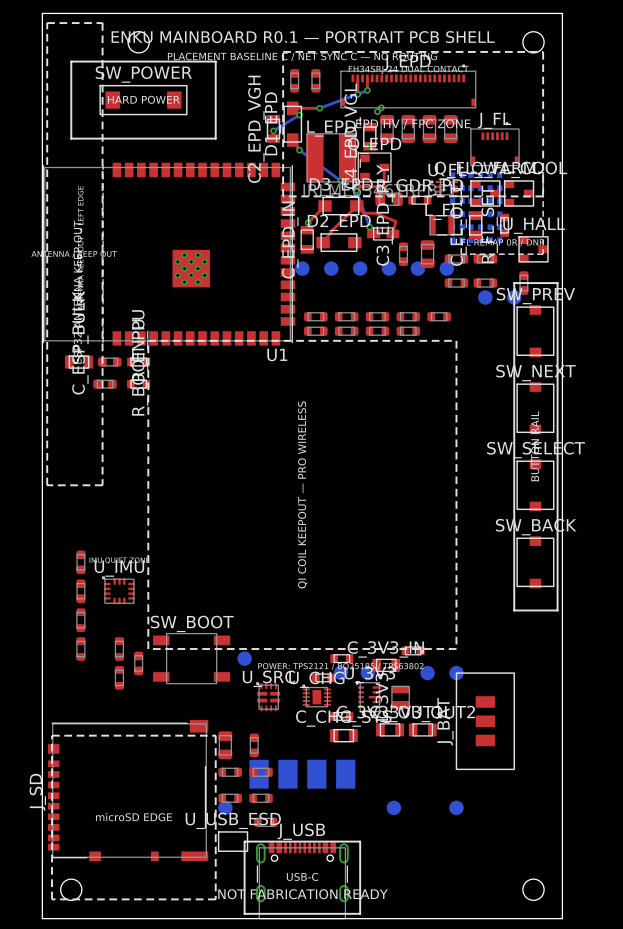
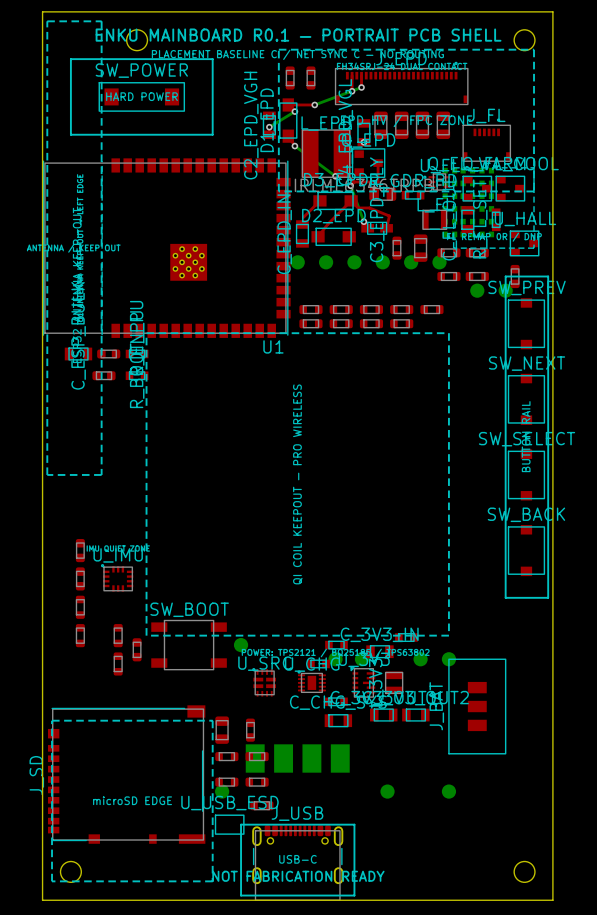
via: (381, 107) -> none
via: (377, 111) -> none
via: (308, 222) -> none

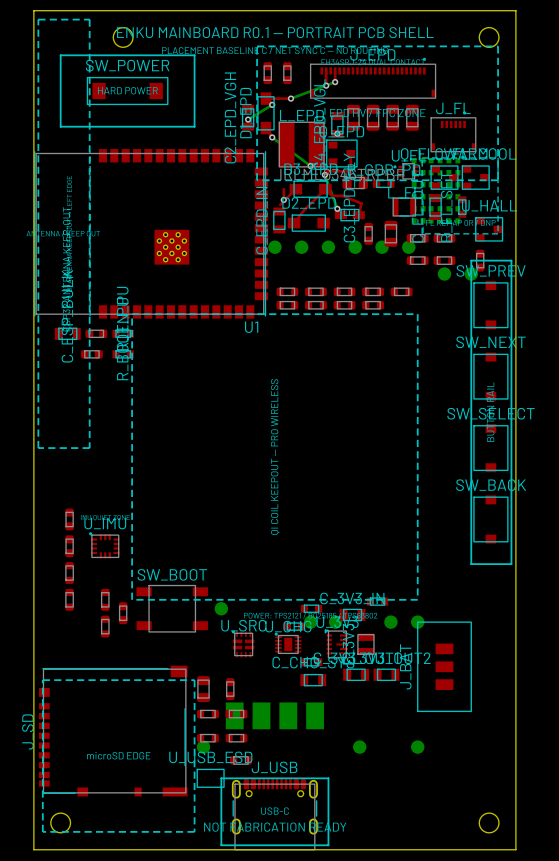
top track: none -> (283, 189) (283, 199)
via: none -> (283, 199)

